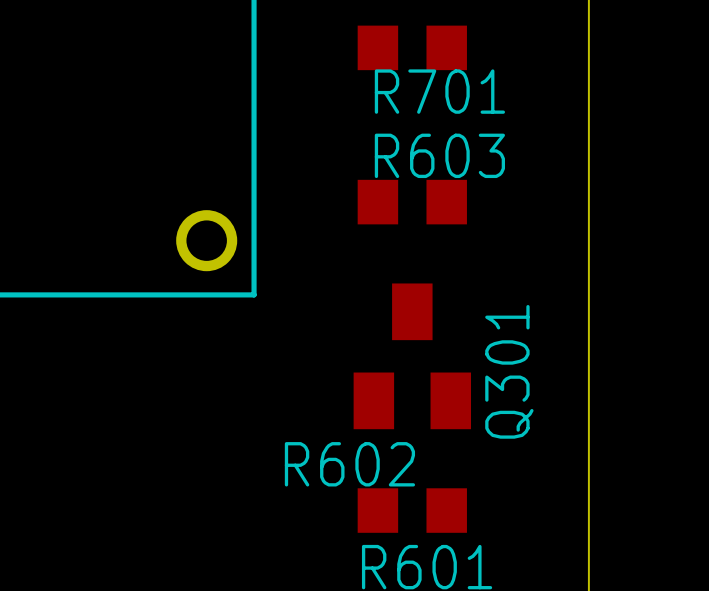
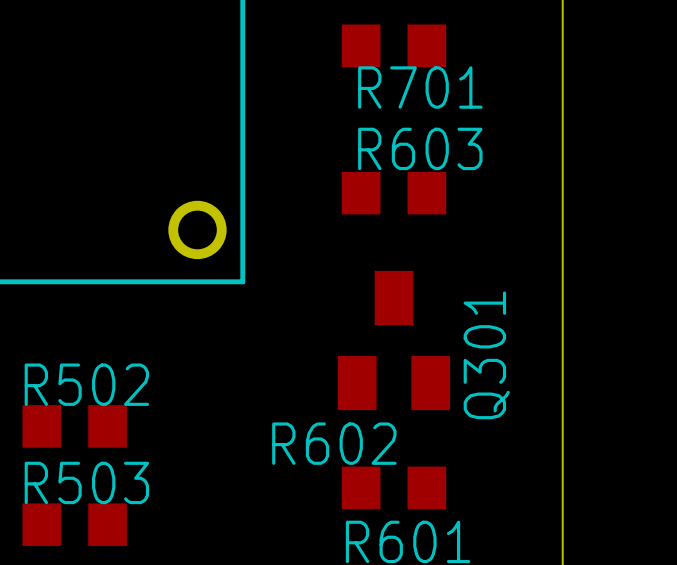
R502: none -> (74, 426)
R503: none -> (74, 524)

